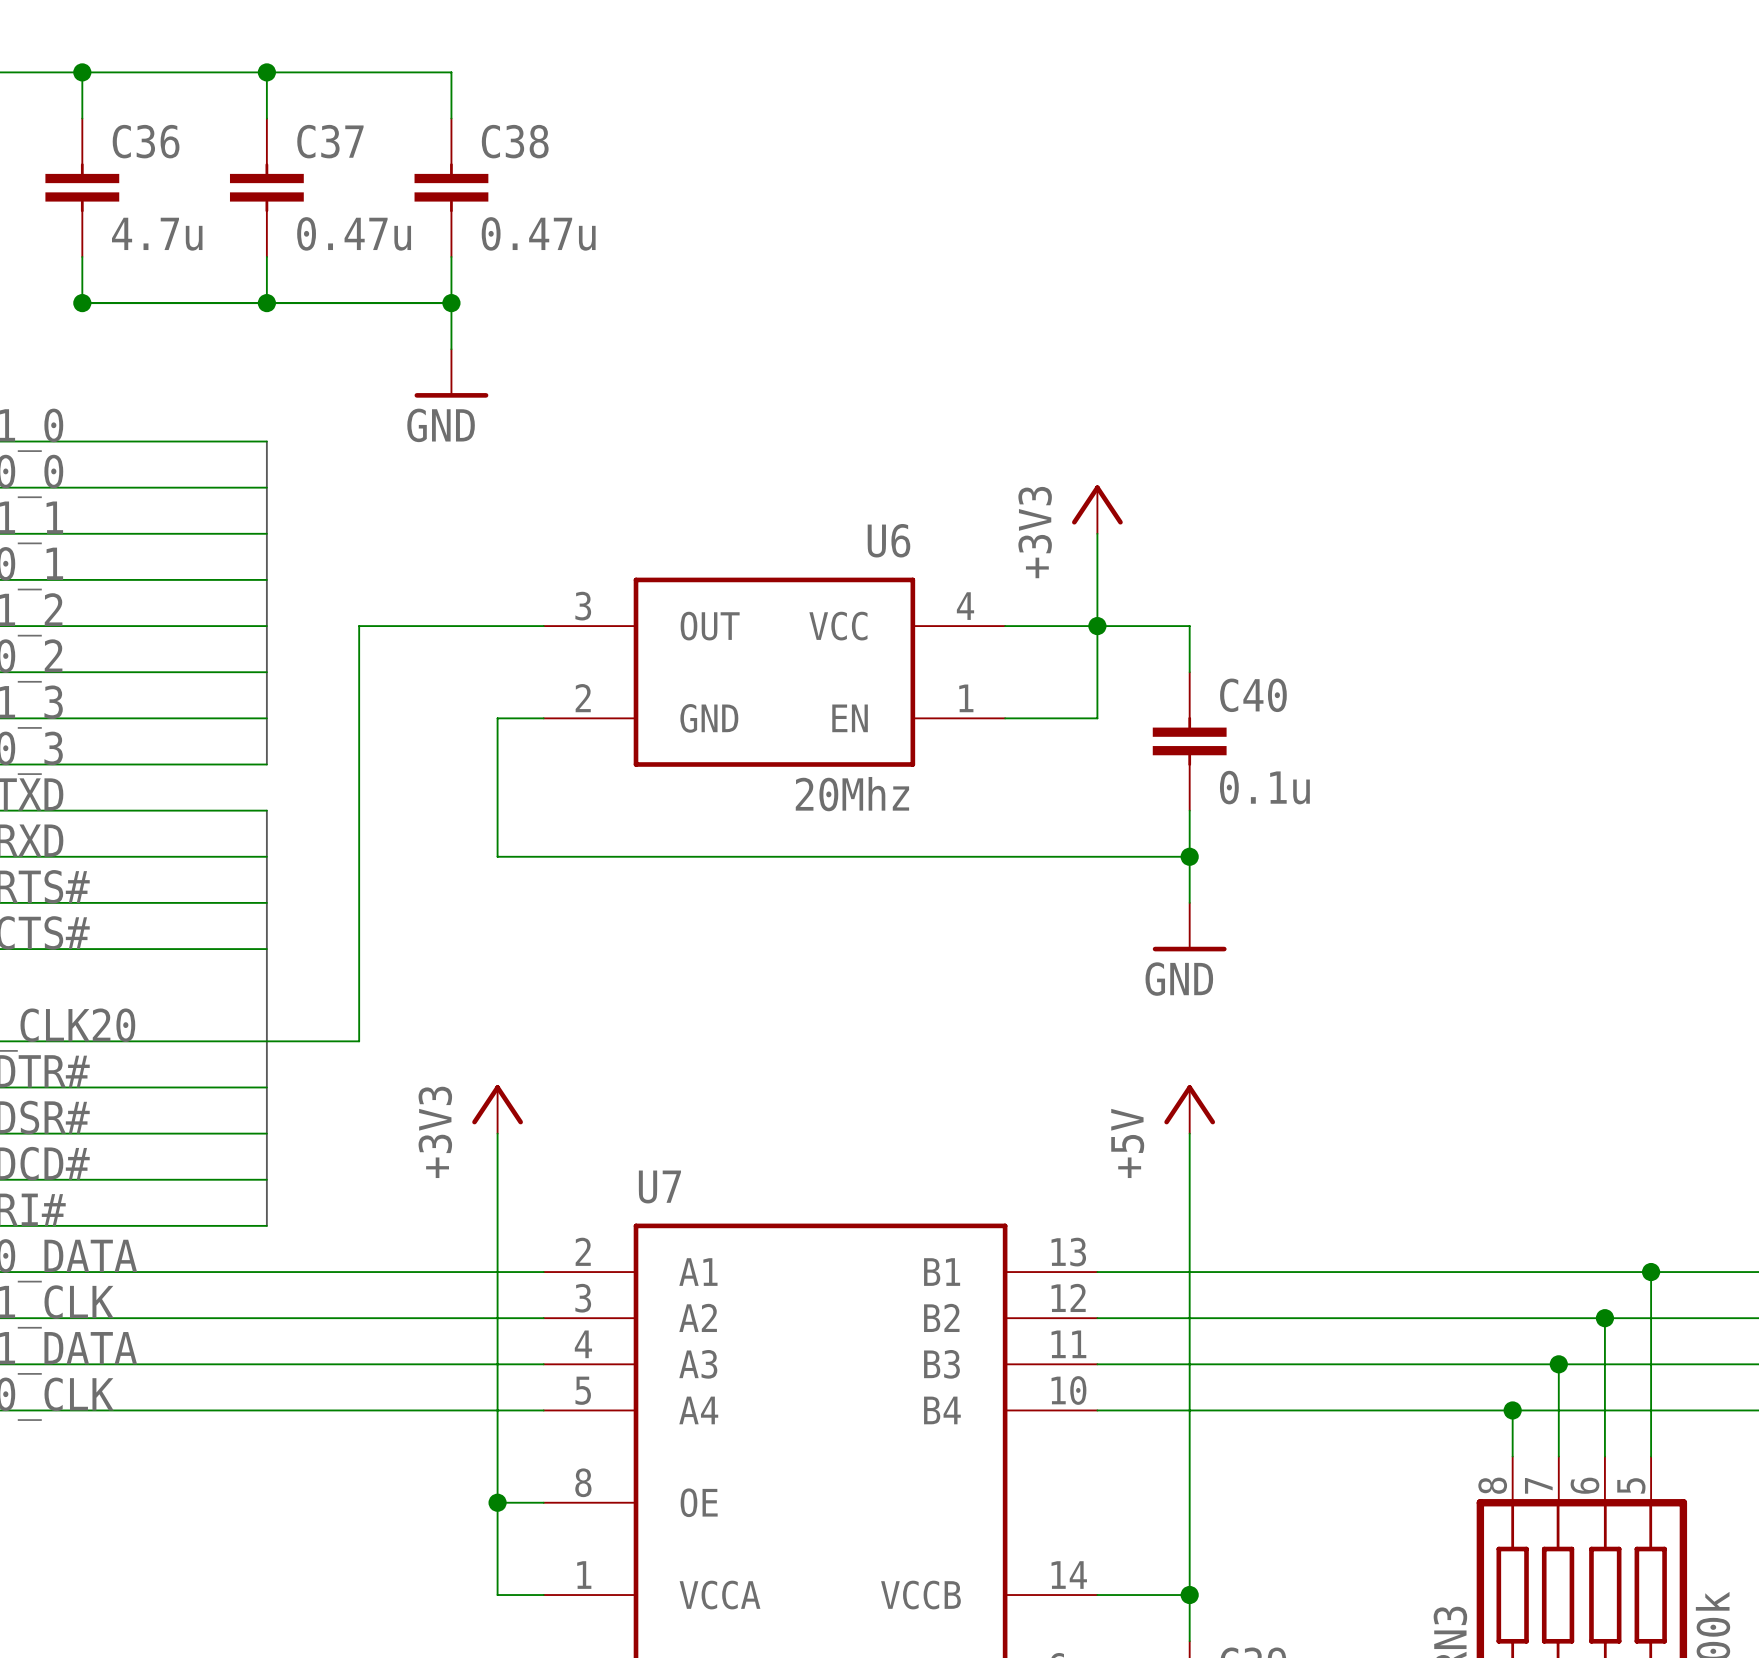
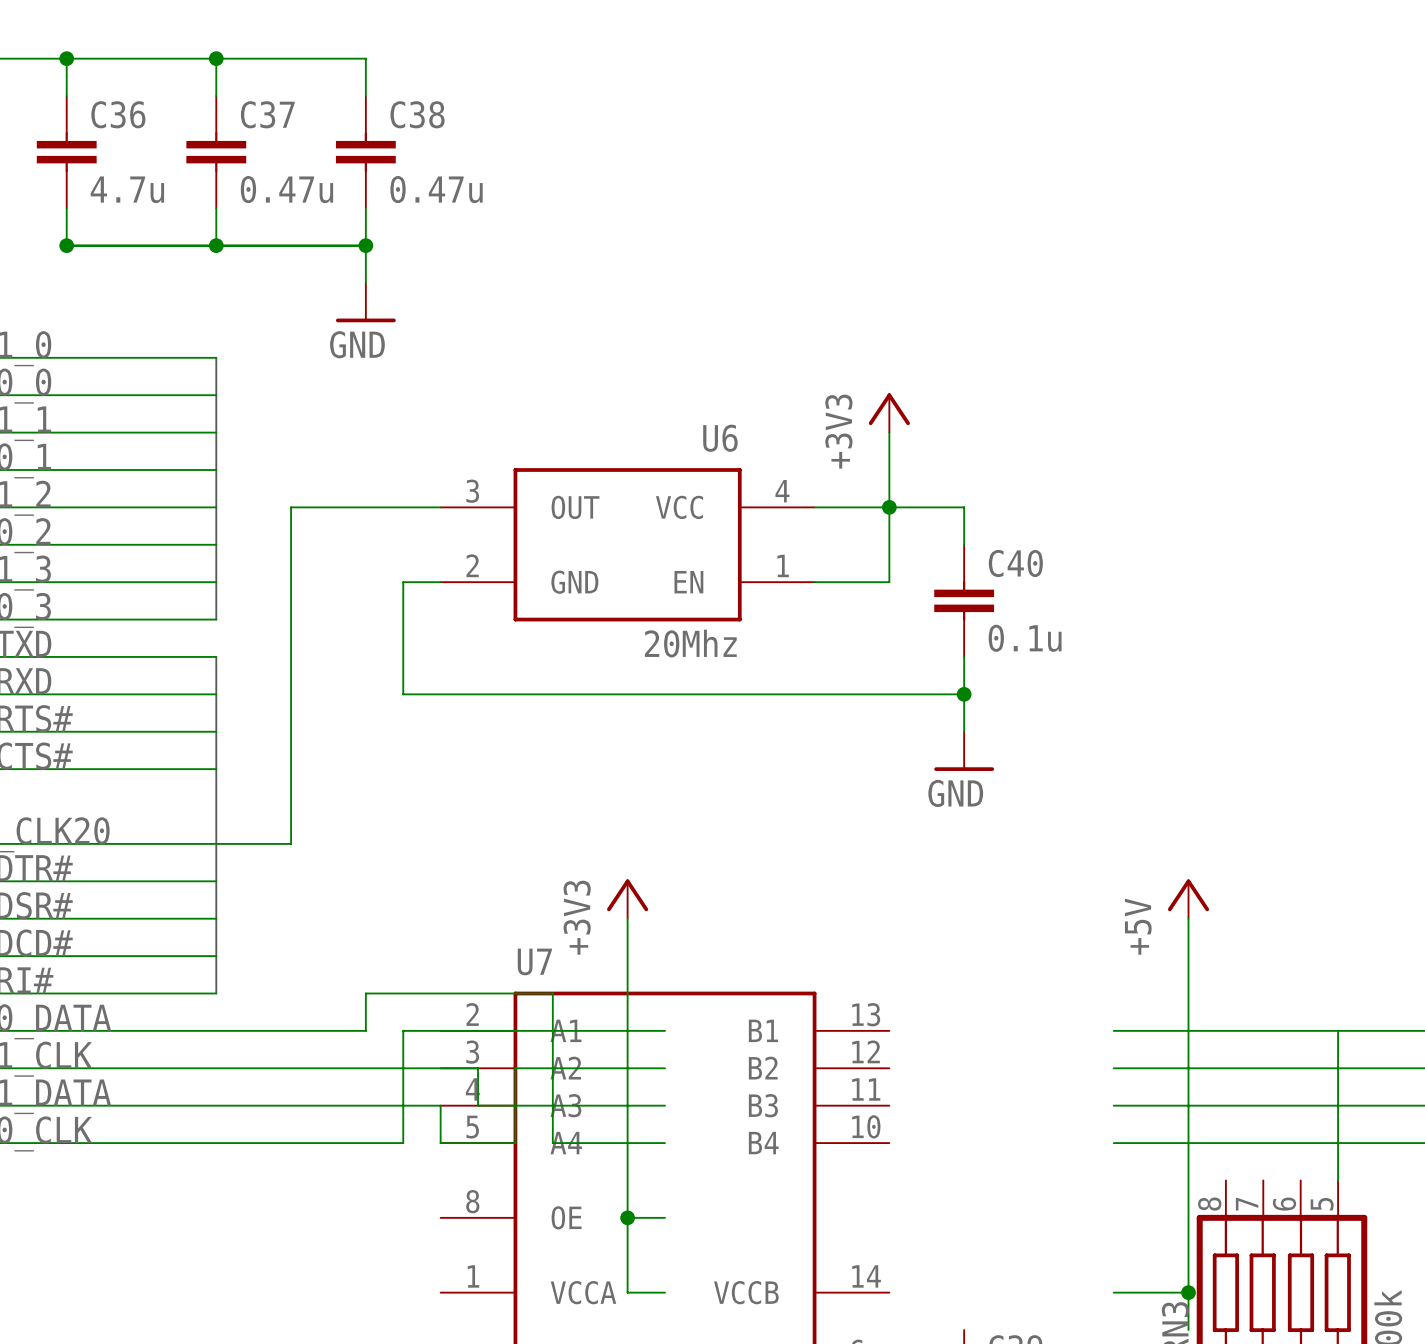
power symbol position: +3V3 (497, 1109) -> +3V3 (627, 899)
power symbol position: +5V (1189, 1109) -> +5V (1188, 899)
wire: (497, 1133) (497, 1272) (451, 1272) -> (665, 1143) (552, 1143) (552, 993) (365, 993) (365, 1030)
wire: none -> (627, 918) (627, 1292) (665, 1292)
wire: (1189, 1133) (1189, 1641) -> (1188, 918) (1188, 1330)
wire: none -> (440, 1030) (665, 1030)
wire: (1097, 1272) (1374, 1272) -> none
junction: (1651, 1272) -> none
wire: none -> (440, 1068) (478, 1068) (478, 1105) (665, 1105)
wire: none -> (665, 1068) (515, 1068) (515, 1143) (440, 1143) (440, 1105)
wire: (1097, 1318) (1374, 1318) -> none
wire: (1604, 1318) (1604, 1456) -> none
junction: (1604, 1318) -> none
wire: (1097, 1364) (1374, 1364) -> none
wire: (1558, 1364) (1558, 1456) -> none
junction: (1558, 1364) -> none
wire: (543, 1410) (497, 1410) (497, 1595) (543, 1595) -> none
wire: (1097, 1410) (1374, 1410) -> none
wire: (1512, 1410) (1512, 1456) -> none
junction: (1512, 1410) -> none
wire: (497, 1502) (543, 1502) -> (627, 1217) (665, 1217)
junction: (497, 1502) -> none
junction: none -> (627, 1217)
wire: (1097, 1595) (1189, 1595) -> (1113, 1292) (1188, 1292)
junction: (1189, 1595) -> none
junction: none -> (1188, 1292)

